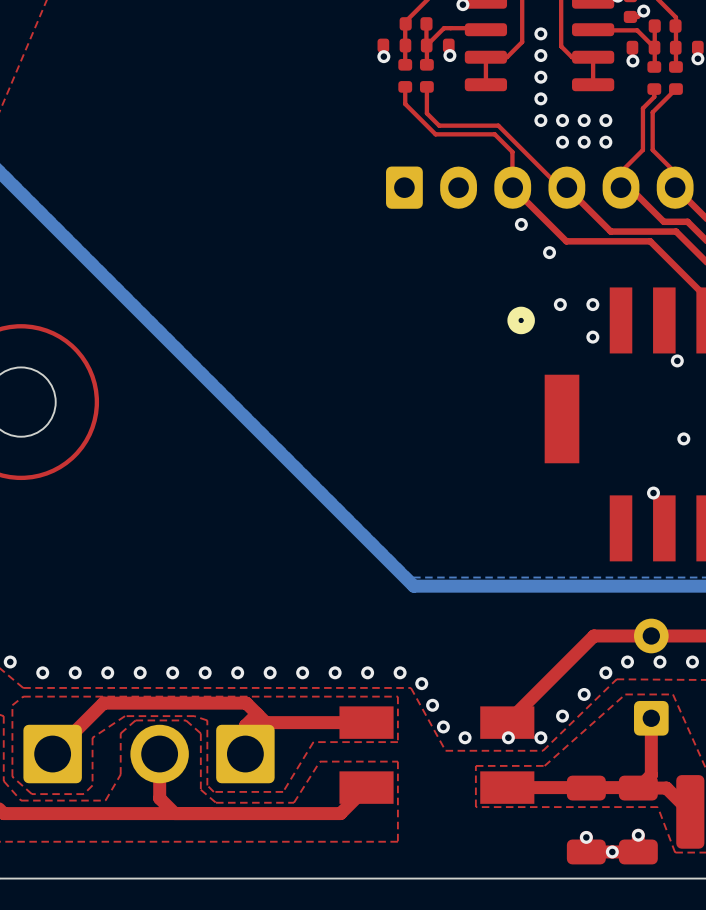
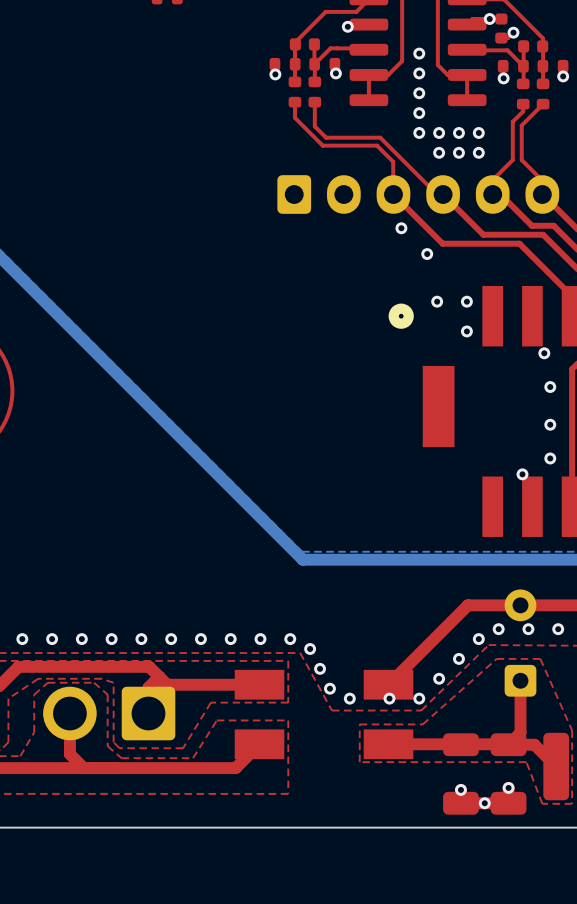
via: none -> (550, 387)
via: none -> (550, 458)

